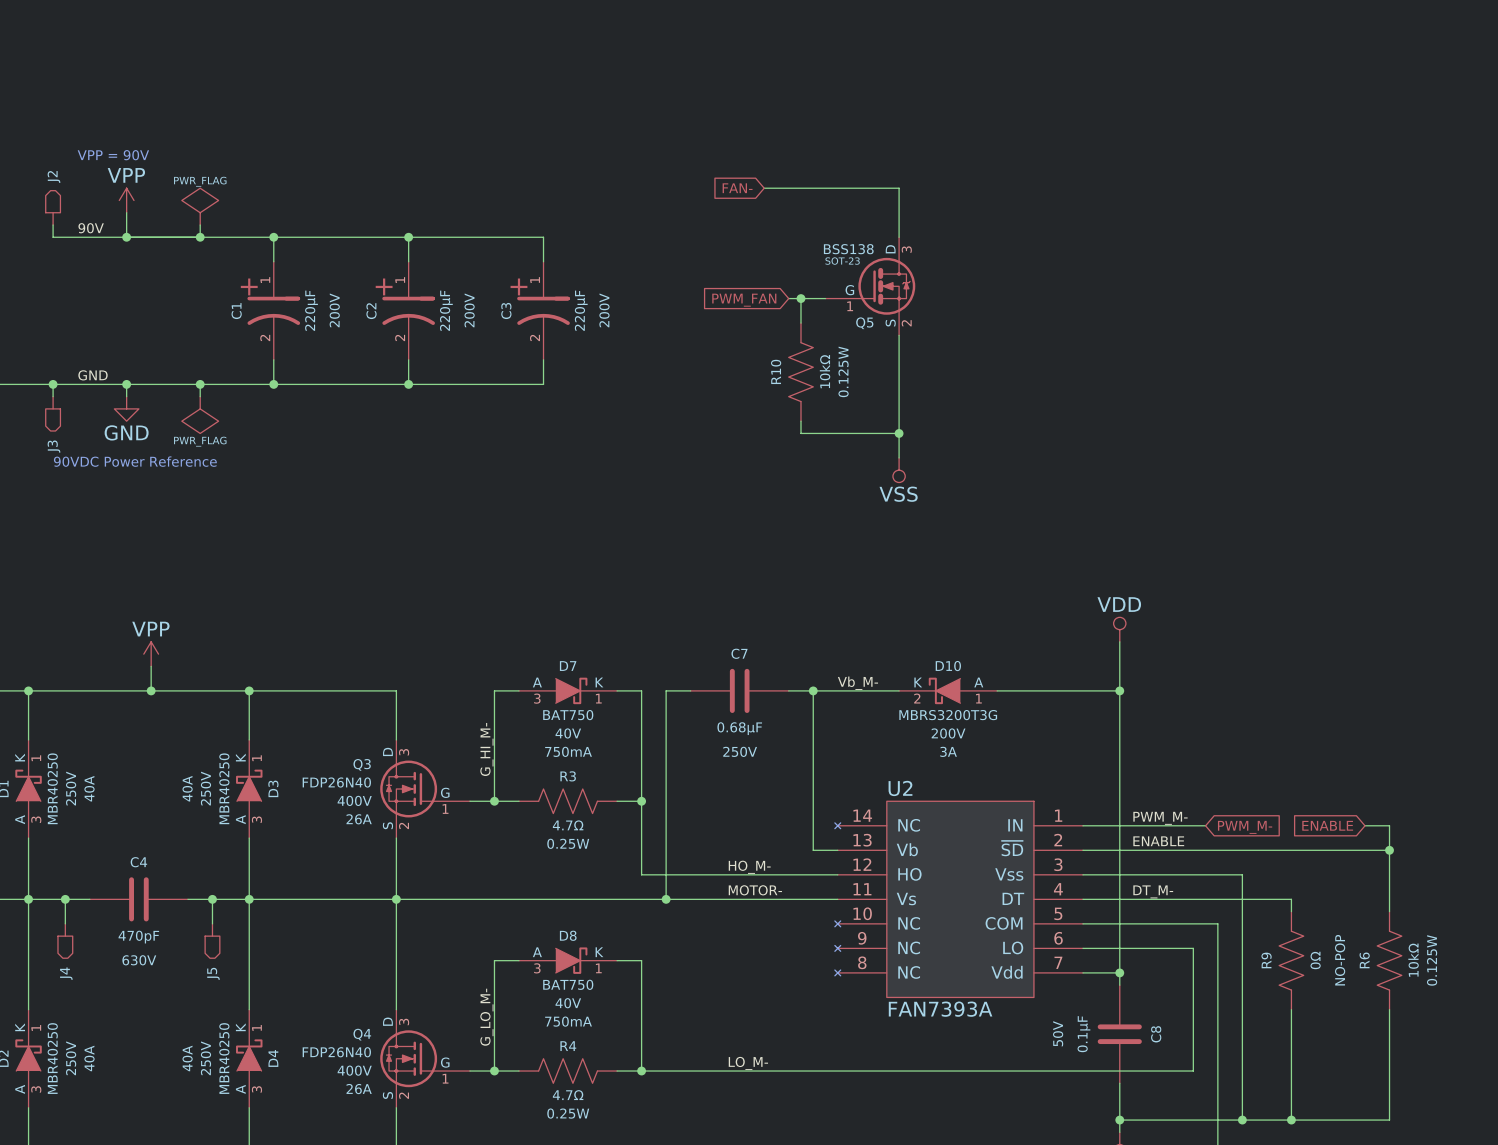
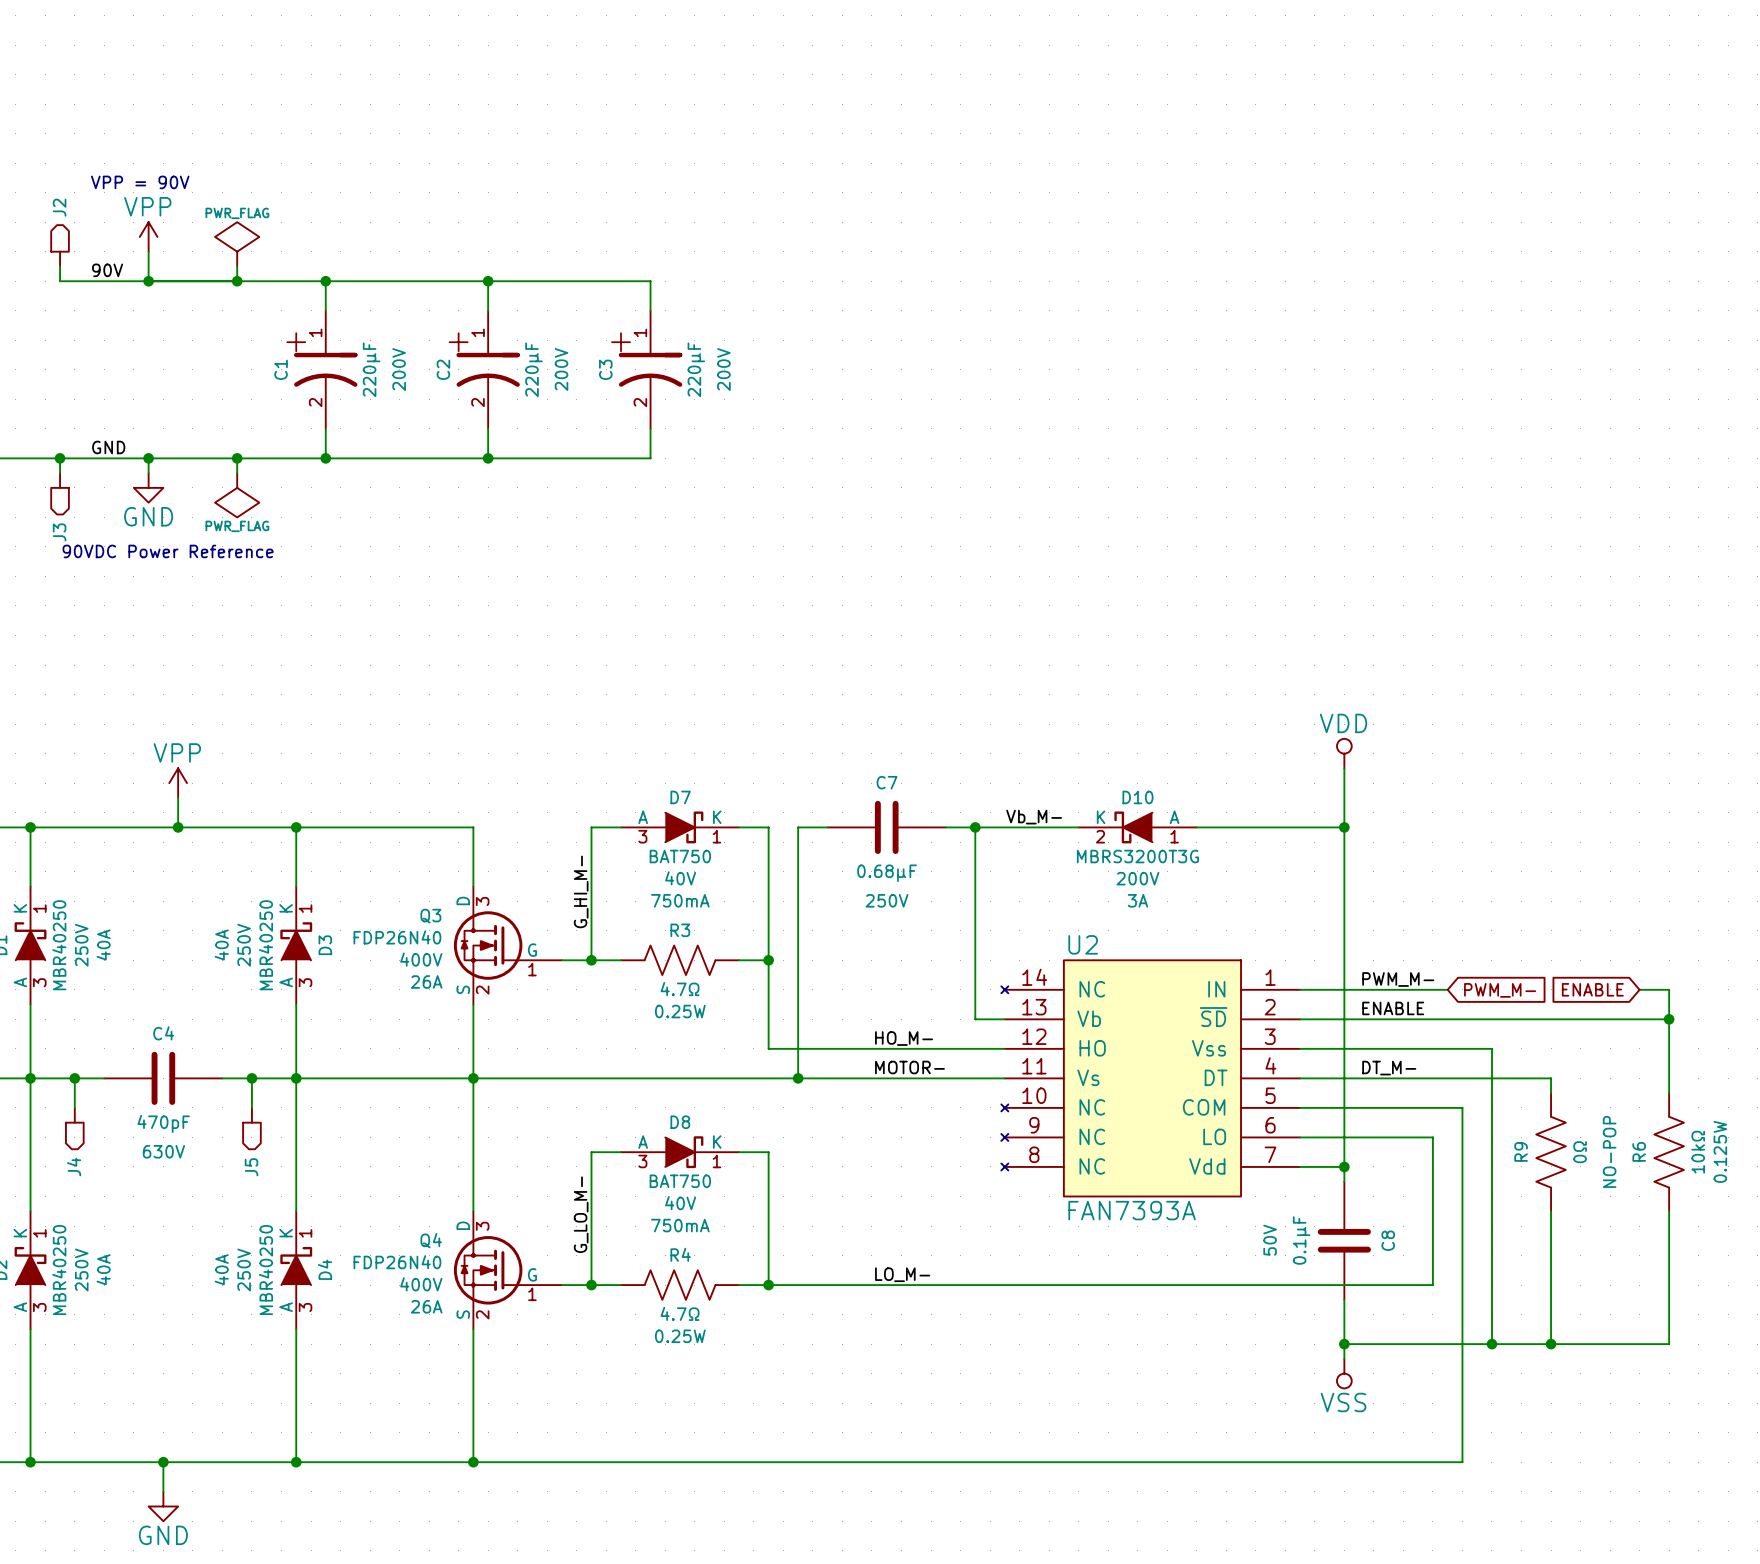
global label: FAN- (737, 188) -> none
wire: (764, 188) (899, 188) (899, 237) -> none
Q5: BSS138 (870, 286) -> none
wire: (788, 298) (825, 298) -> none
wire: (800, 298) (800, 323) -> none
junction: (800, 298) -> none
global label: PWM_FAN (744, 300) -> none
wire: (899, 335) (899, 457) -> none
R10: (800, 372) -> none
wire: (800, 421) (800, 433) (899, 433) -> none
junction: (899, 433) -> none
power symbol: VSS (899, 470) -> none

